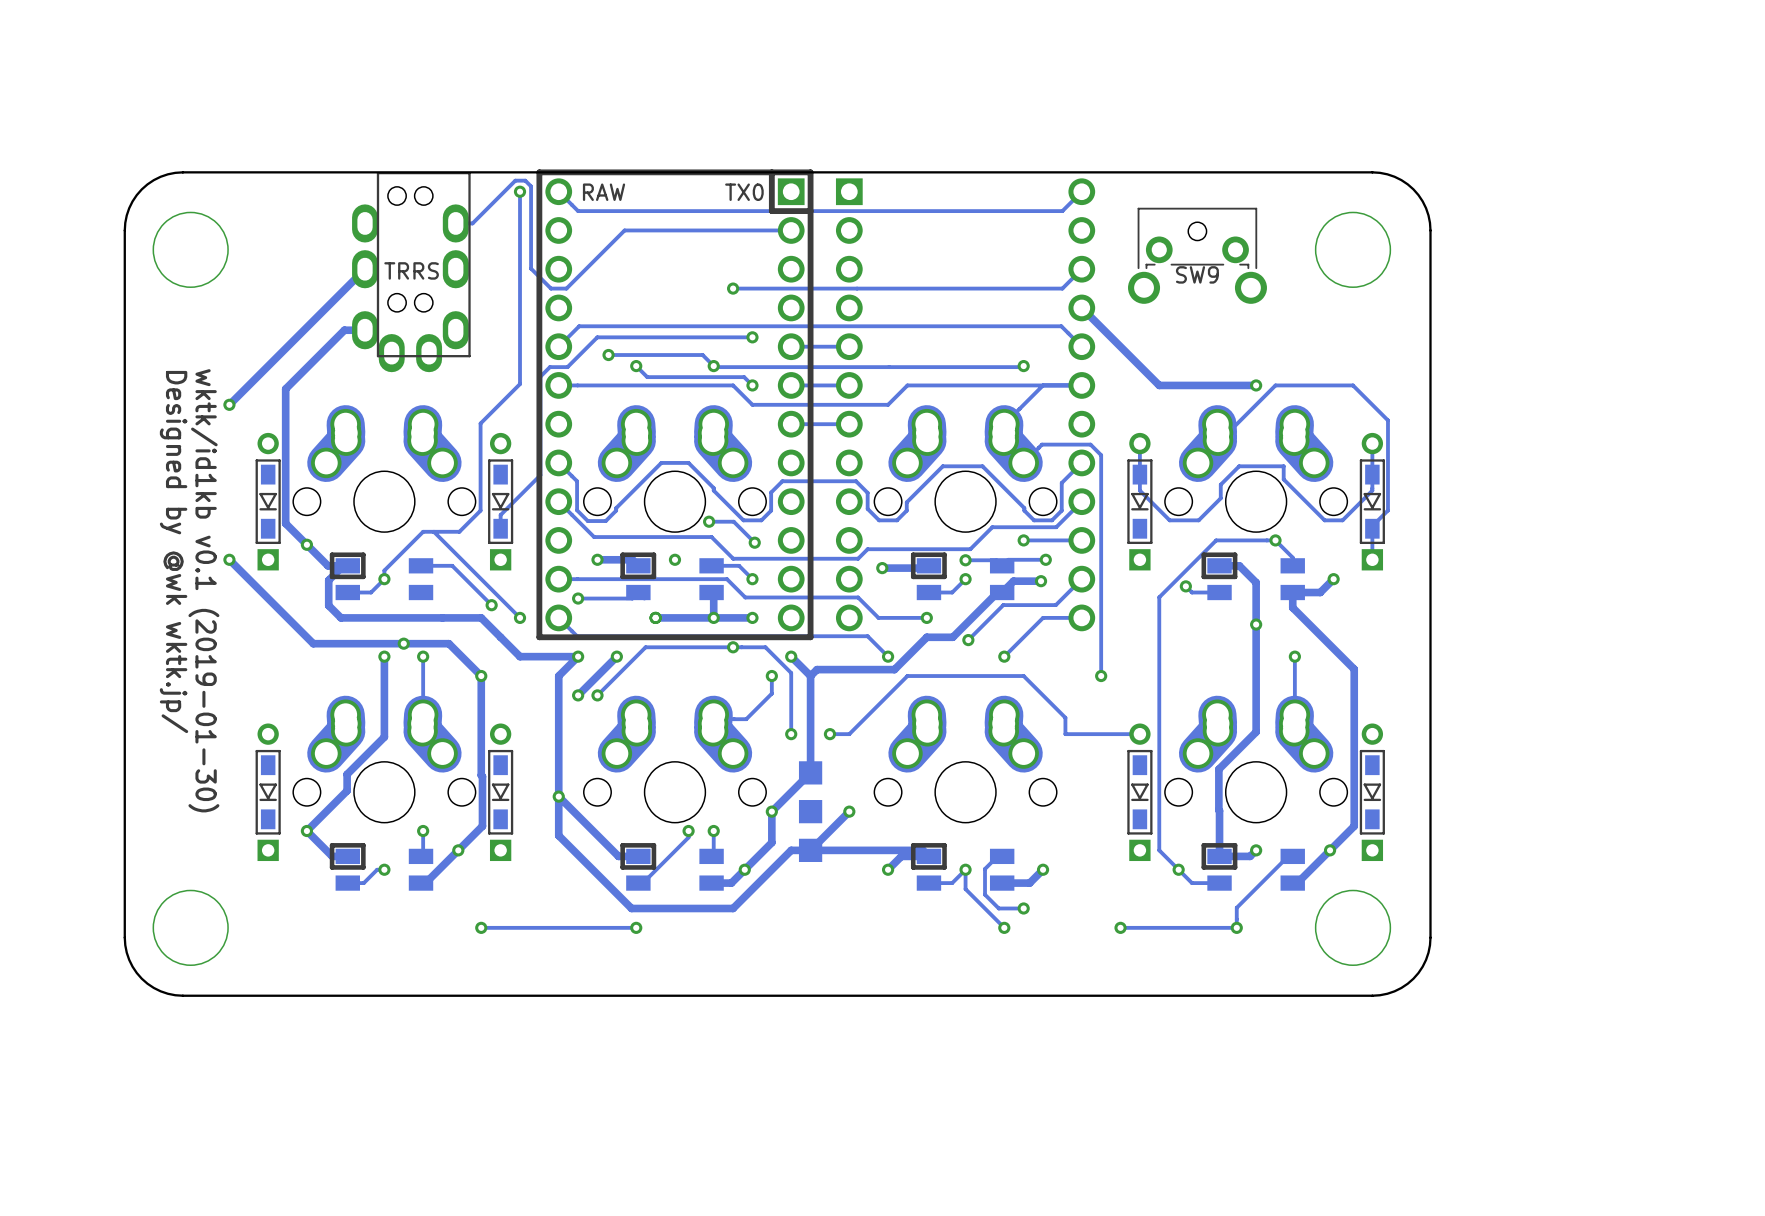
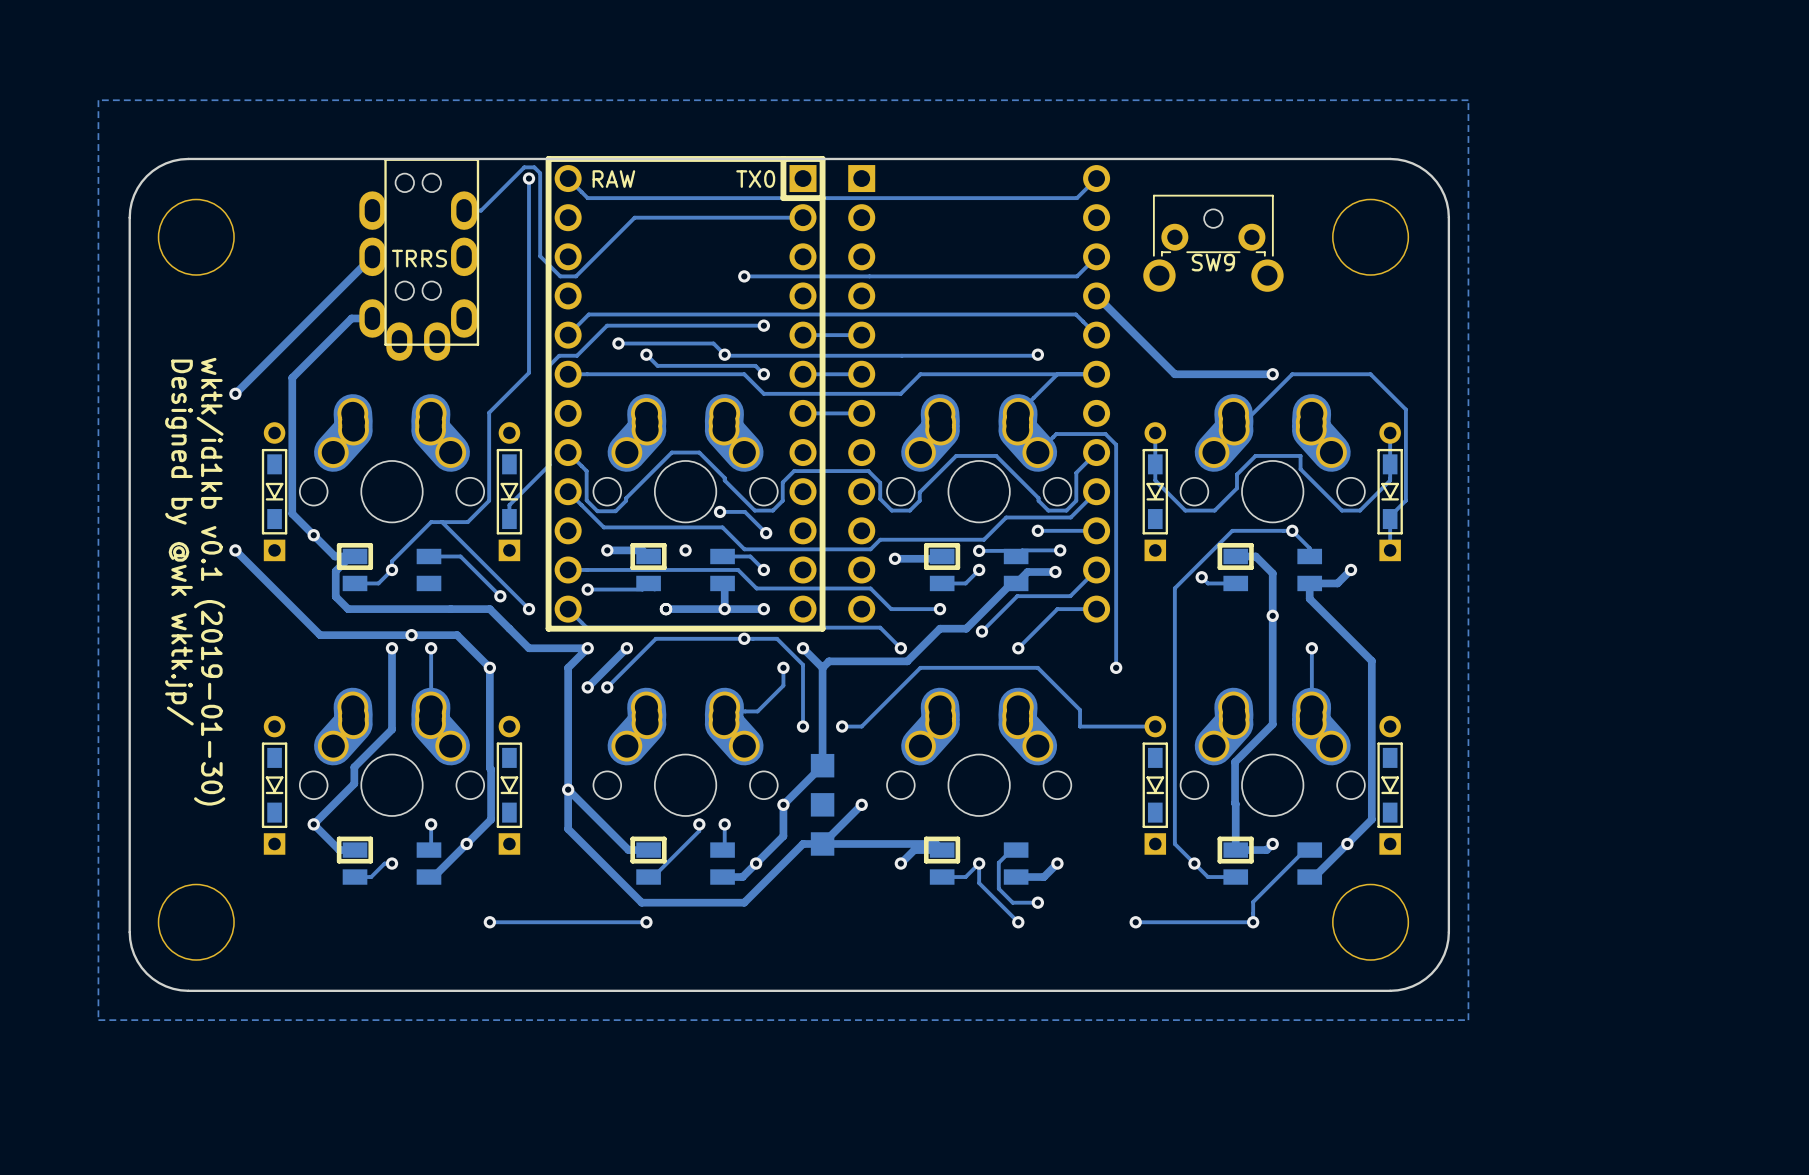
zone outline: none -> (1468, 100) (1468, 1020) (98, 1020) (98, 100) (1468, 100)

